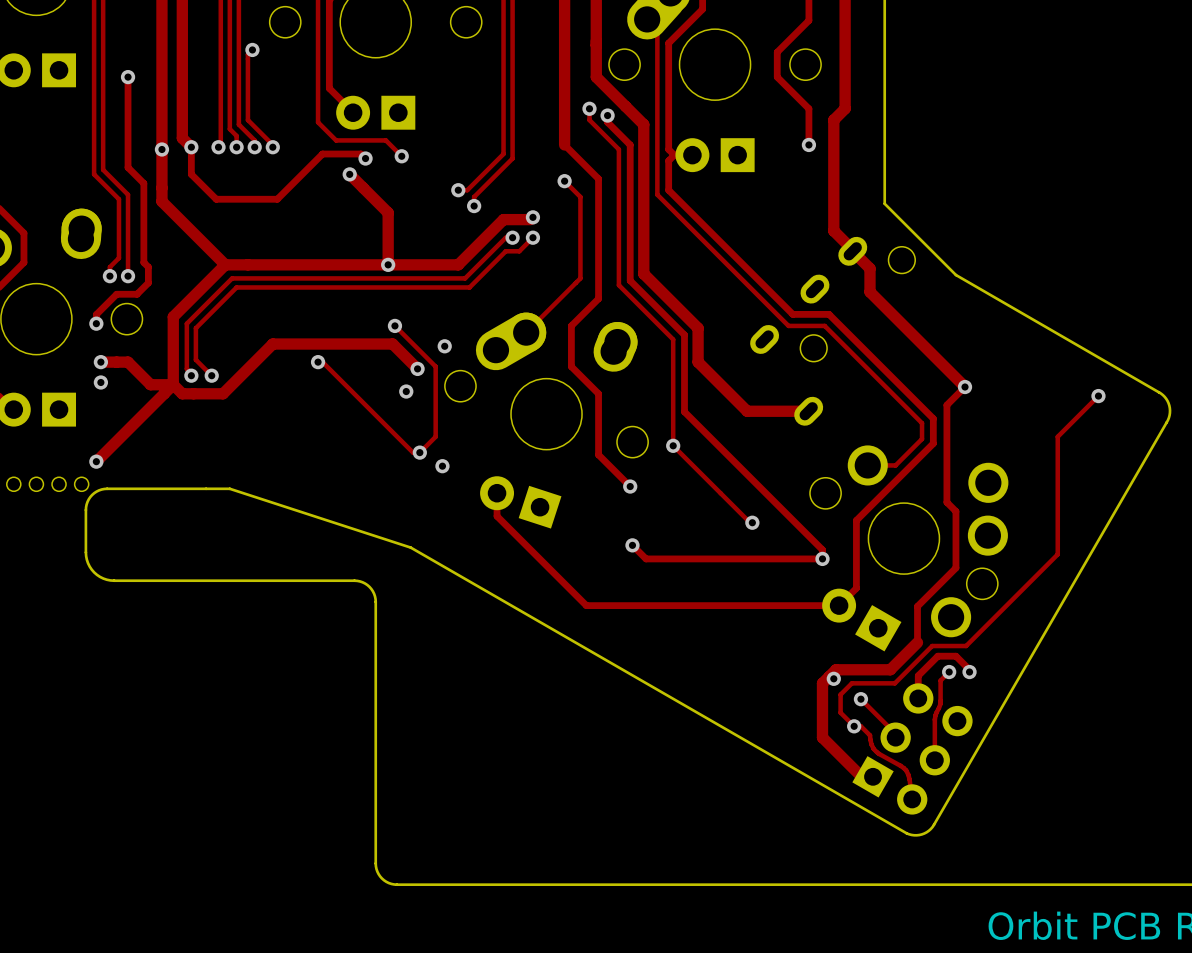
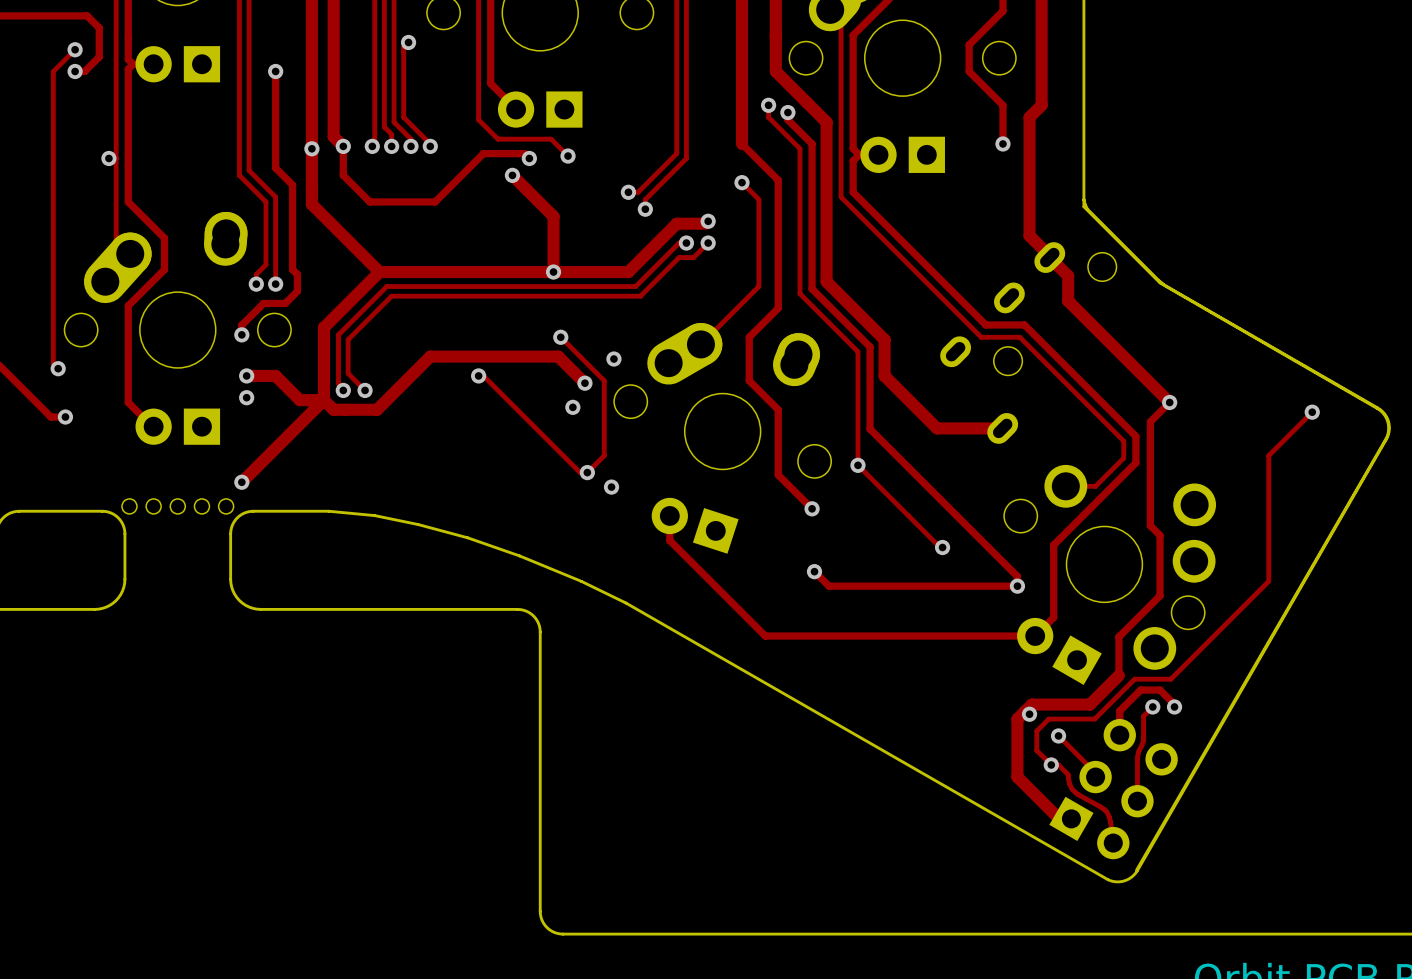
board edge: (177, 488) (229, 488) (410, 547) (906, 833) (921, 834) (933, 824) -> (328, 511) (374, 515) (467, 537) (519, 555) (581, 581) (626, 603) (1108, 879) (1118, 881) (1127, 879) (1137, 870) (1385, 439) (1389, 427) (1386, 417) (1379, 409) (1164, 285) (1087, 209) (1083, 199)

